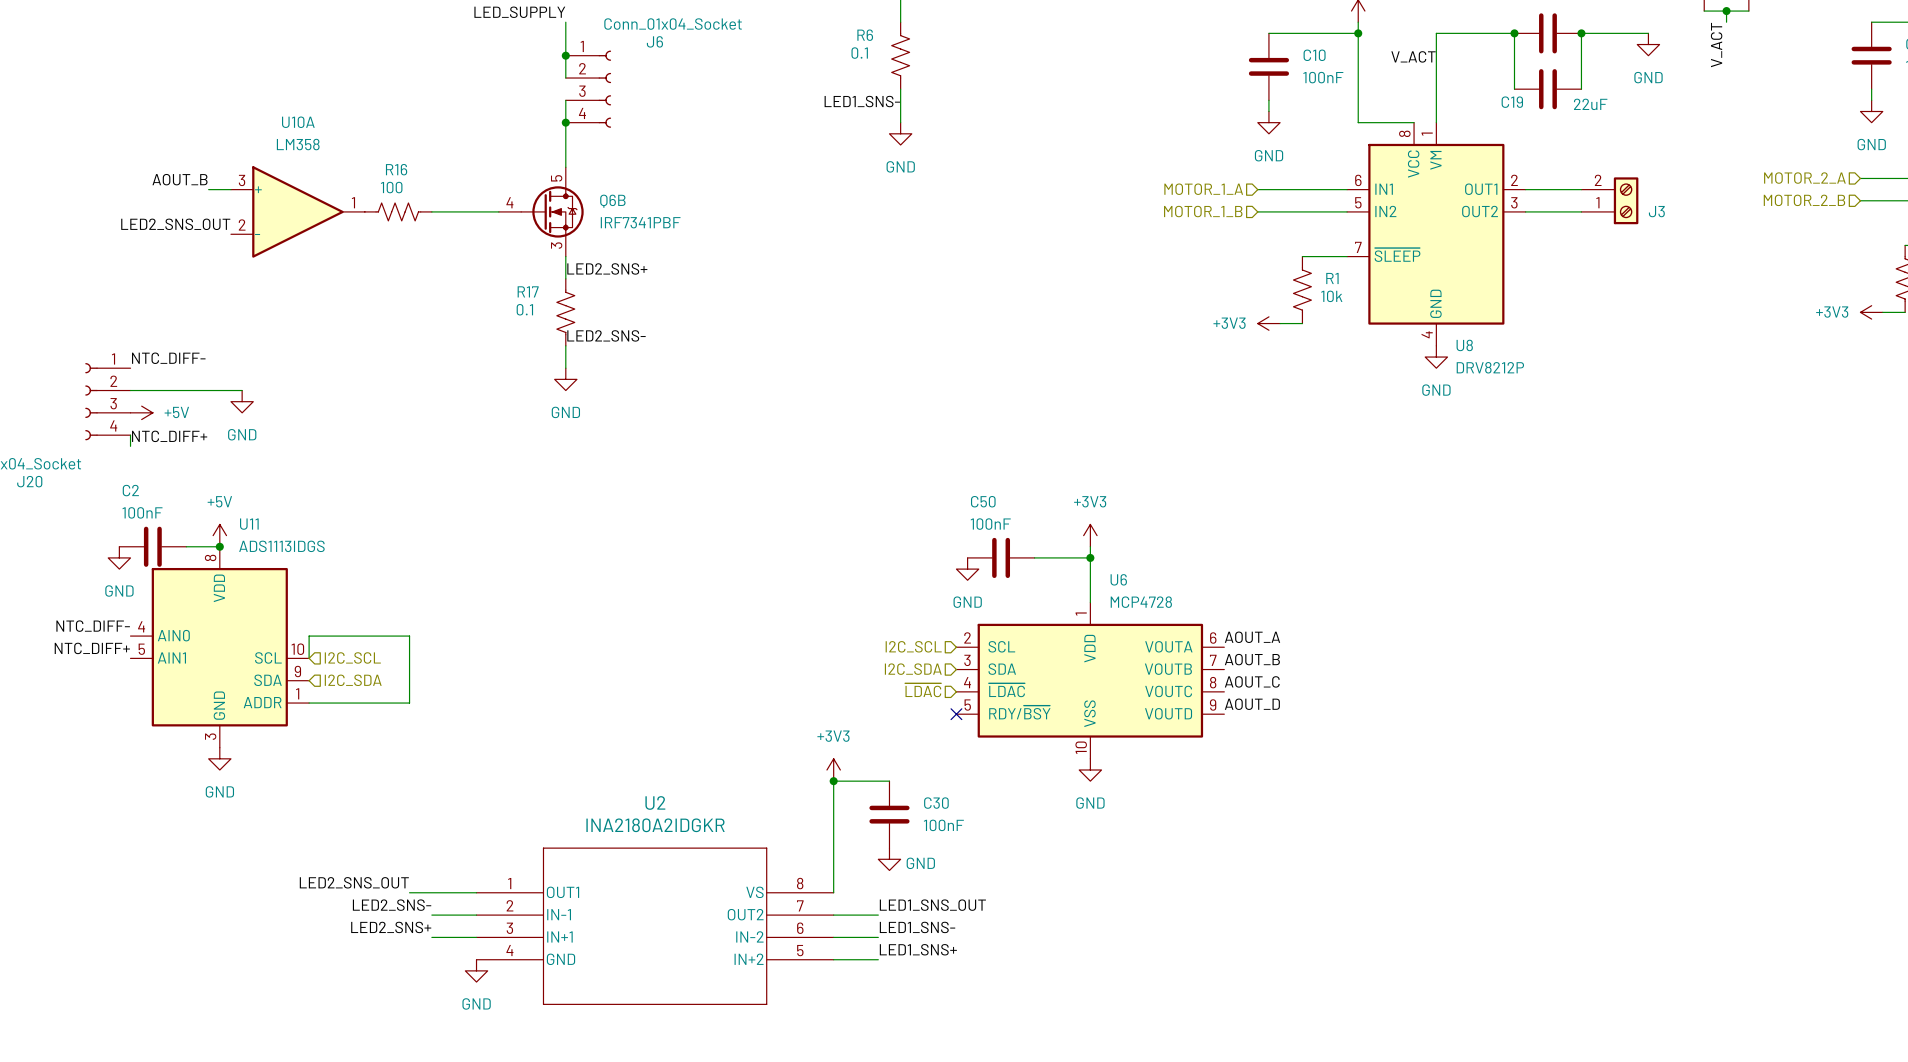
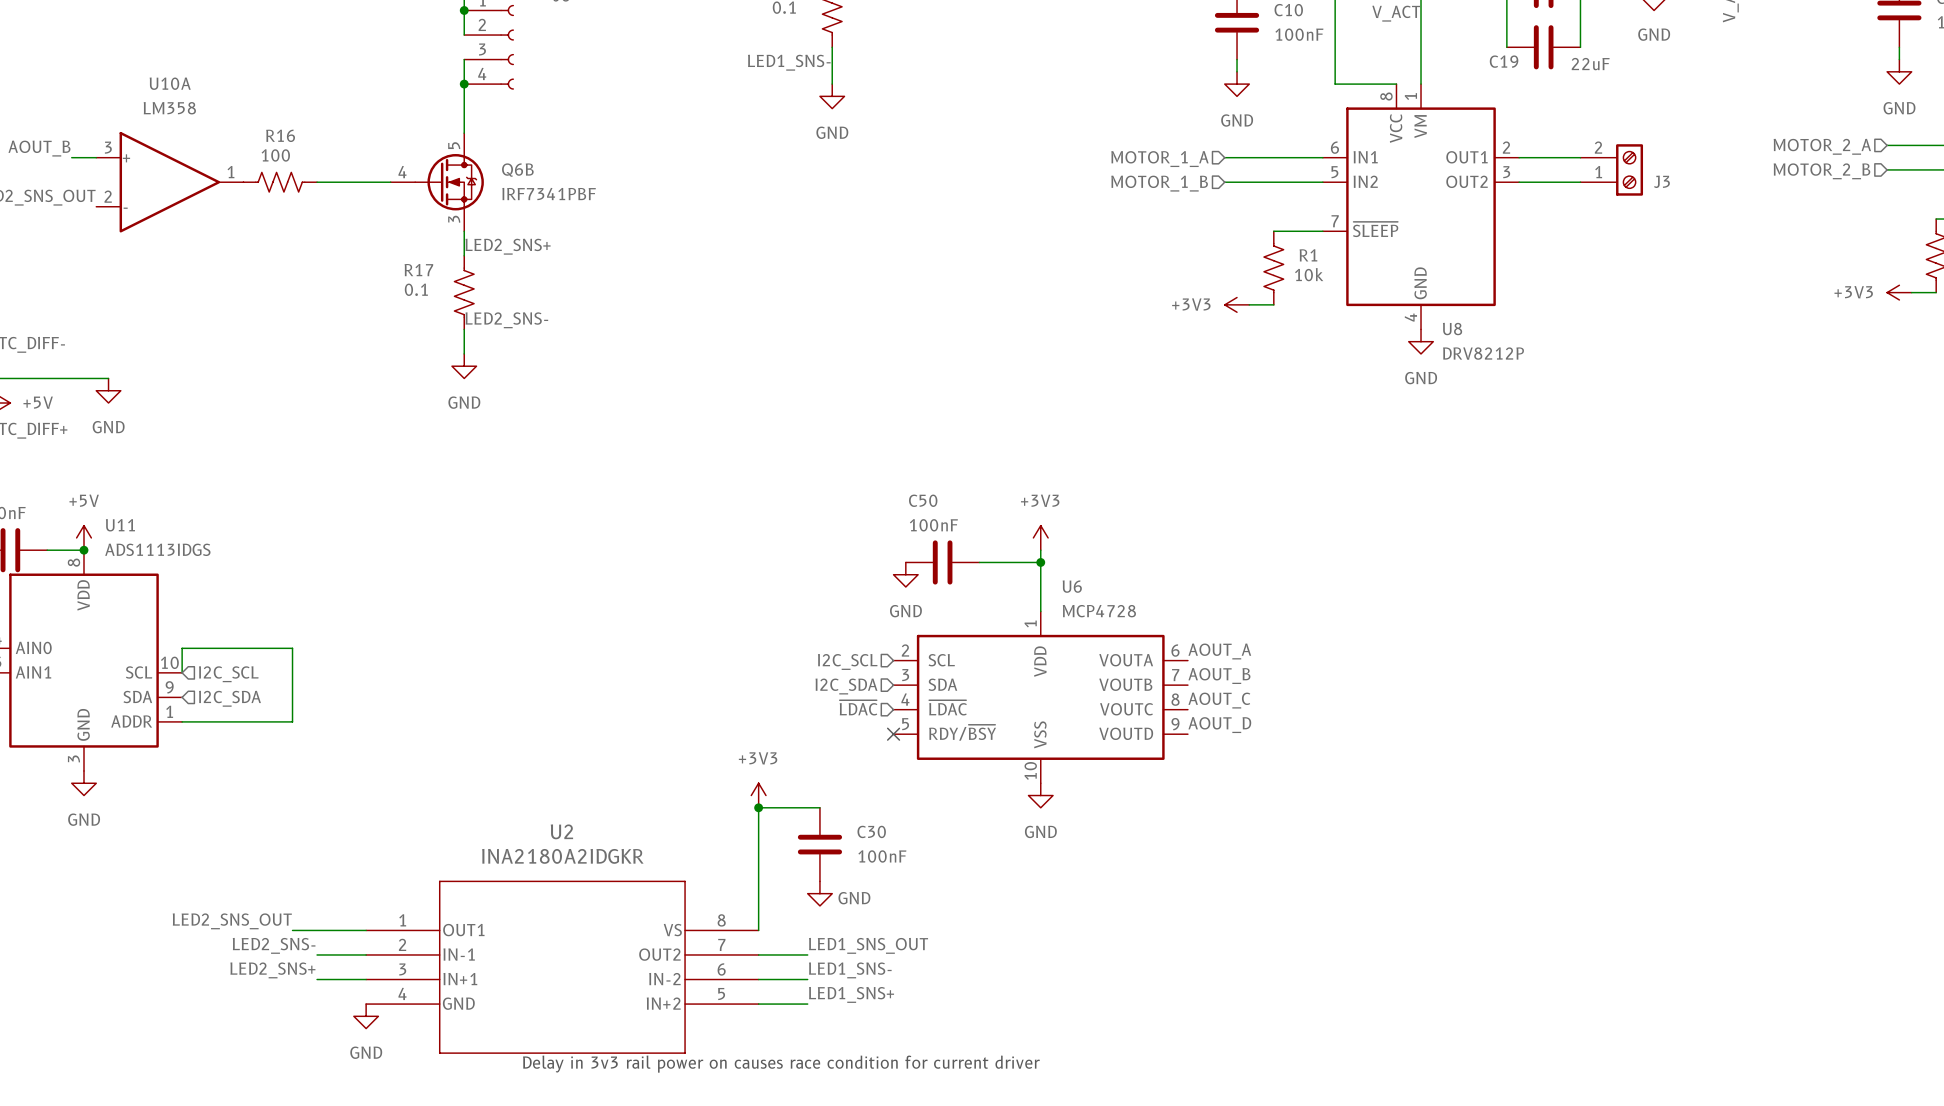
text: none -> Delay in 3v3 rail power on causes race condition for current driver (781, 1064)

